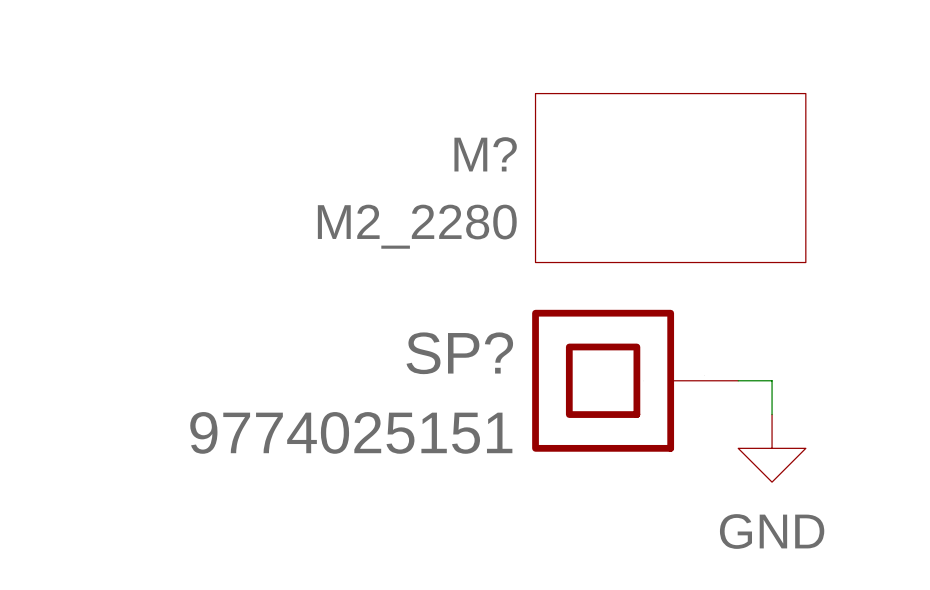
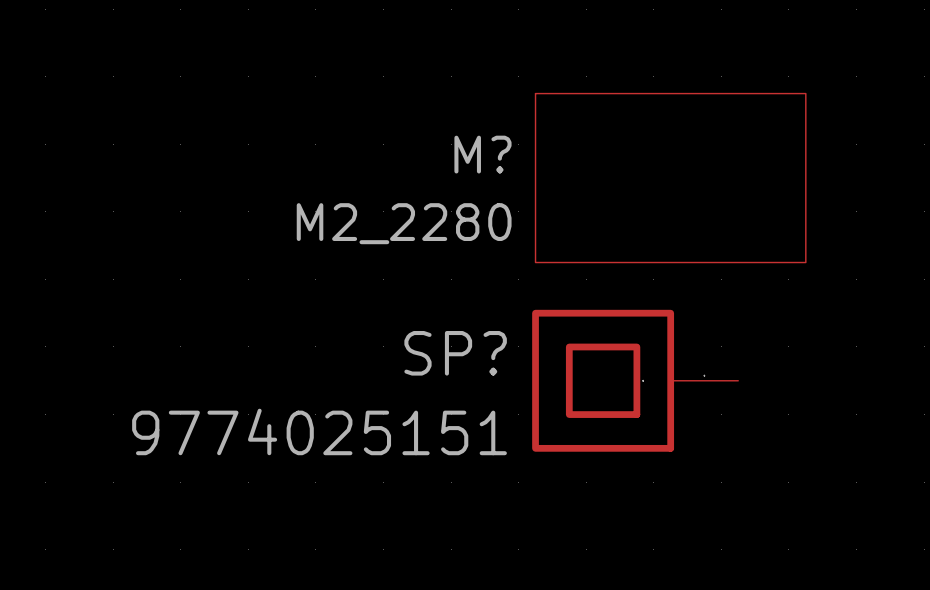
wire: (738, 380) (772, 380) (772, 414) -> none
power symbol: GND (772, 448) -> none

